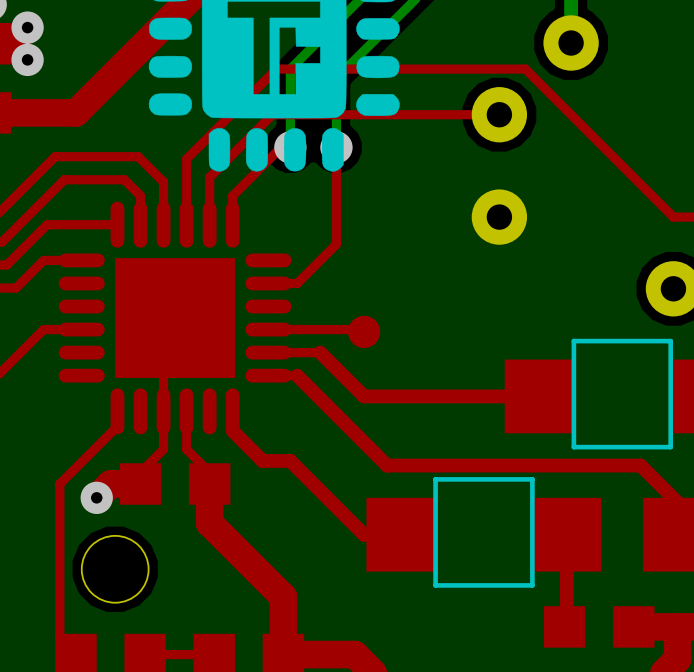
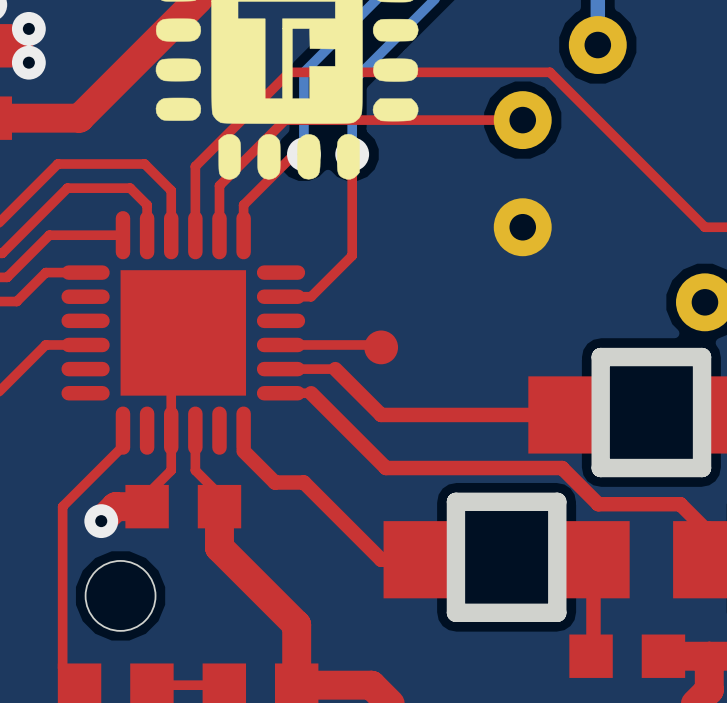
board edge: none -> (600, 357) (600, 468) (702, 468) (702, 357) (600, 357)
top track: (368, 447) (387, 465) (640, 465) (677, 502) -> (385, 468) (562, 468) (598, 504) (680, 504) (709, 533) (709, 559)
board edge: none -> (455, 501) (557, 501) (557, 612) (455, 612) (455, 501)

